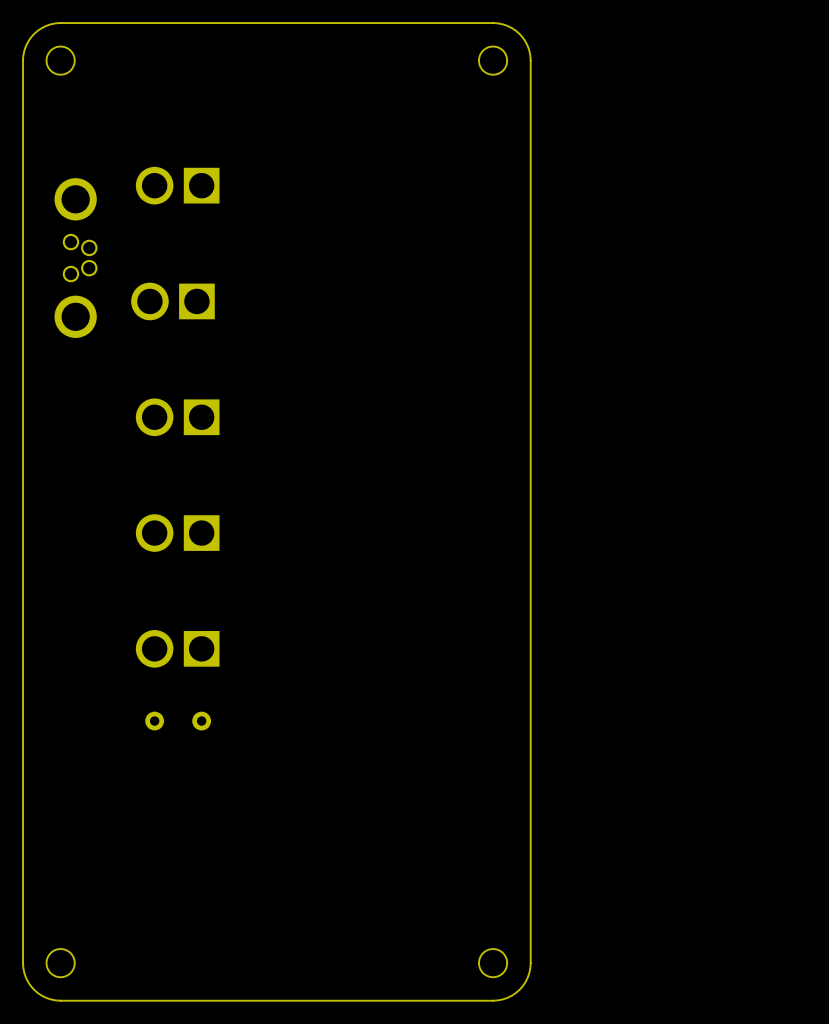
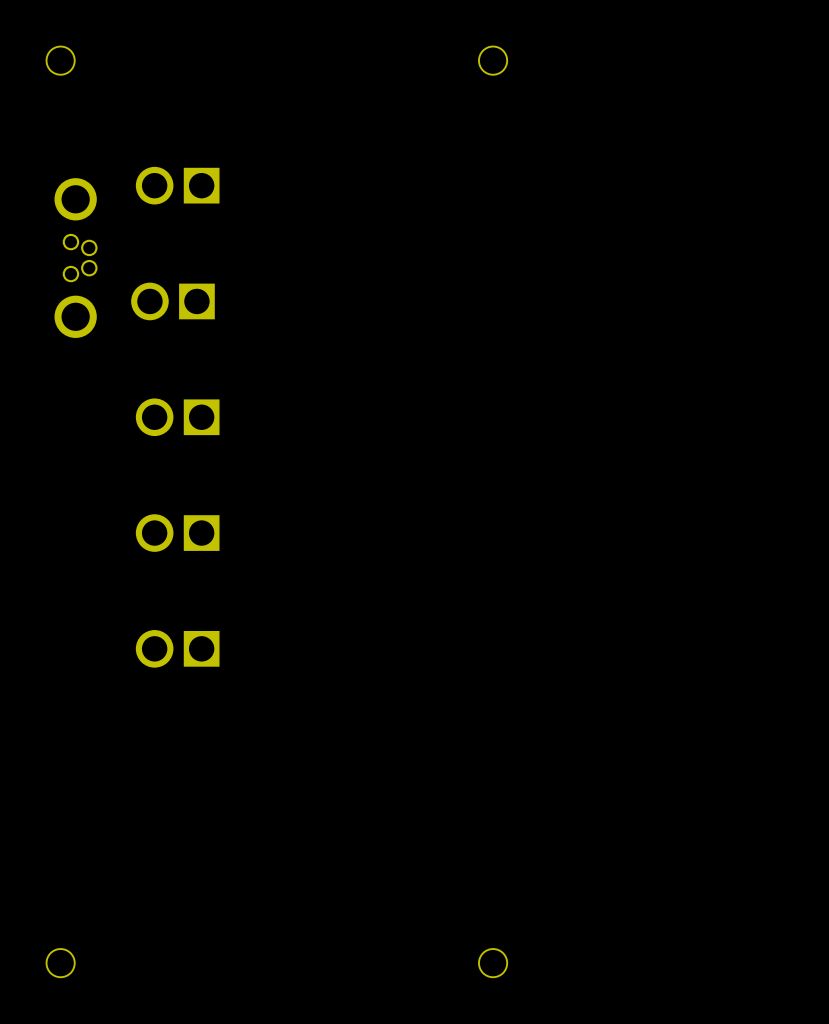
board edge: (493, 23) (60, 23) (41, 28) (34, 34) (25, 46) (23, 60) (23, 963) (24, 972) (30, 986) (46, 997) (60, 1000) (493, 1000) (511, 995) (522, 986) (527, 977) (530, 963) (530, 60) (527, 46) (519, 34) (507, 25) (493, 23) -> none
part: (154, 721) -> none
part: (201, 721) -> none

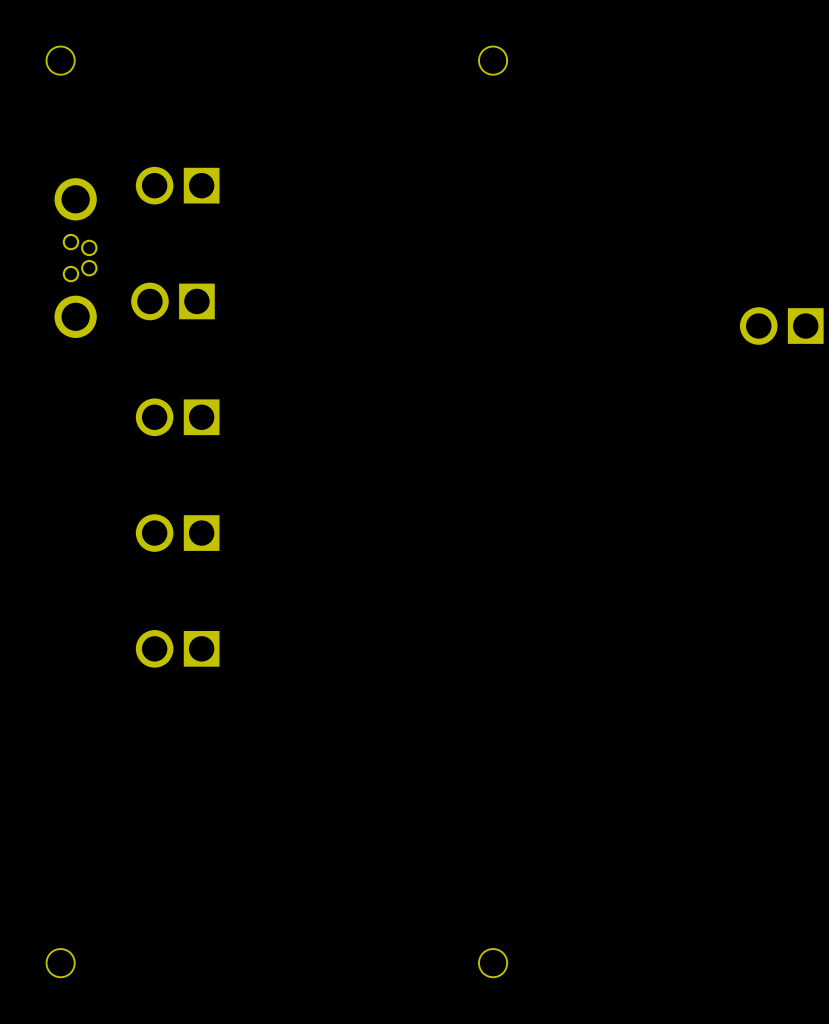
part: none -> (781, 326)

